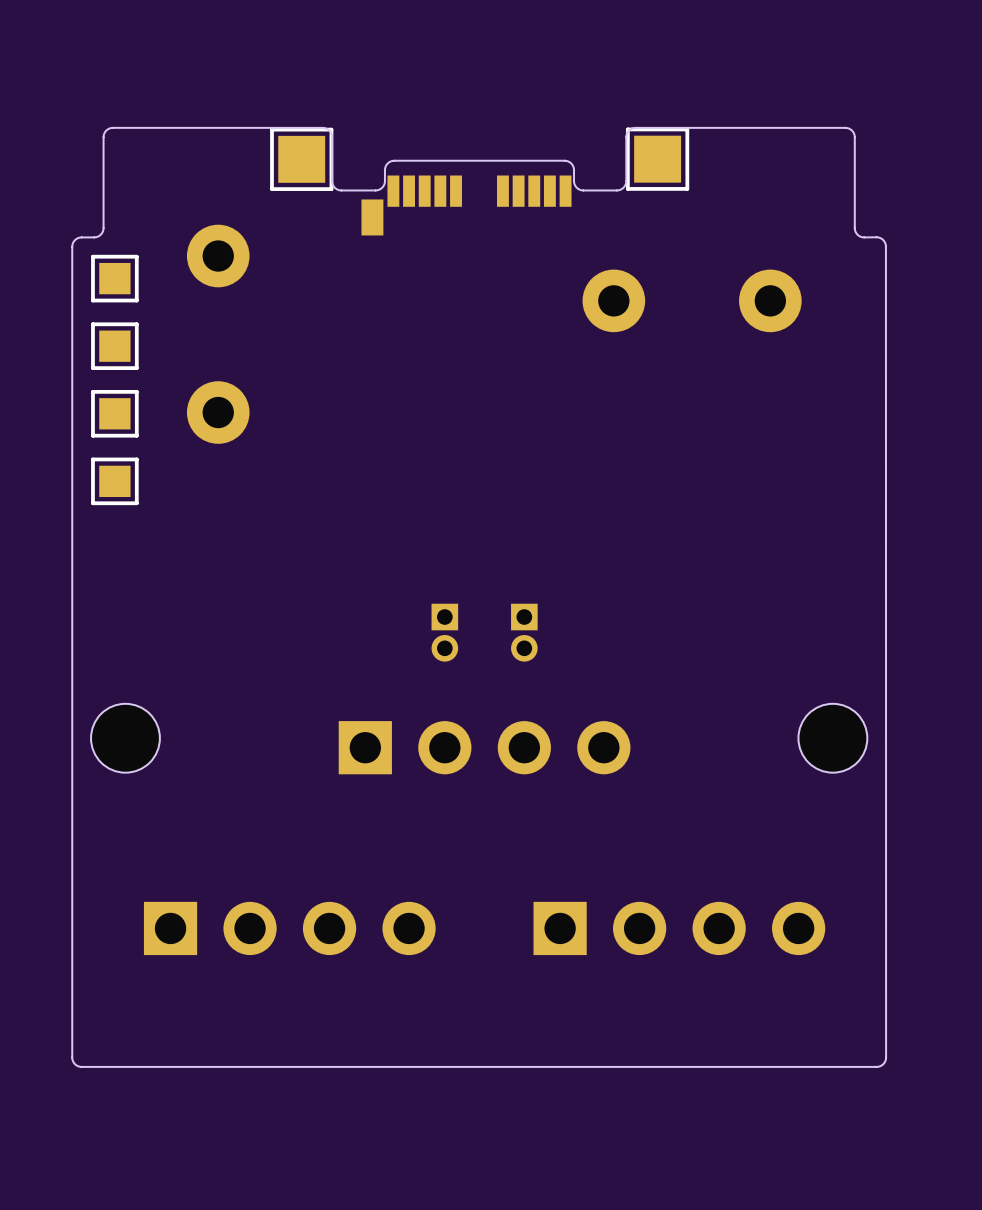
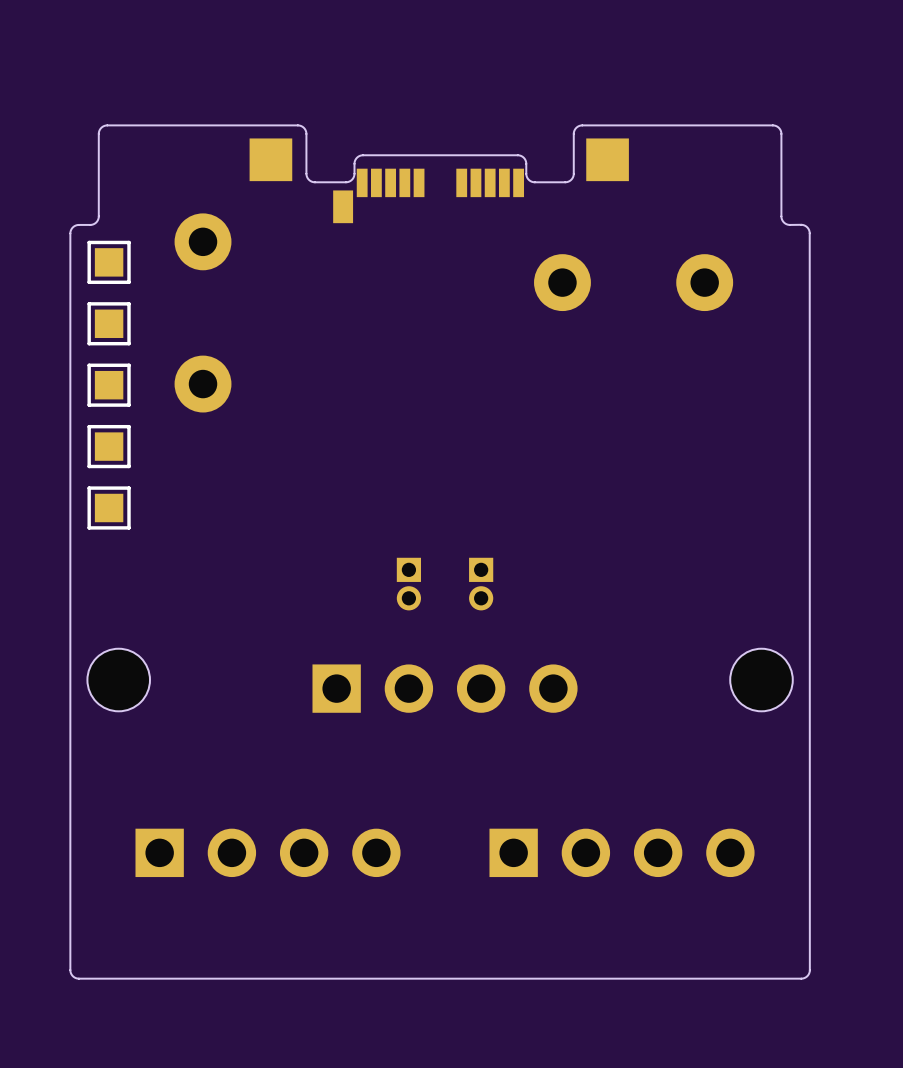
part footprint: [270, 127, 334, 191] -> [249, 138, 293, 182]
part footprint: [625, 127, 690, 191] -> [586, 138, 629, 182]
part: none -> (109, 508)

